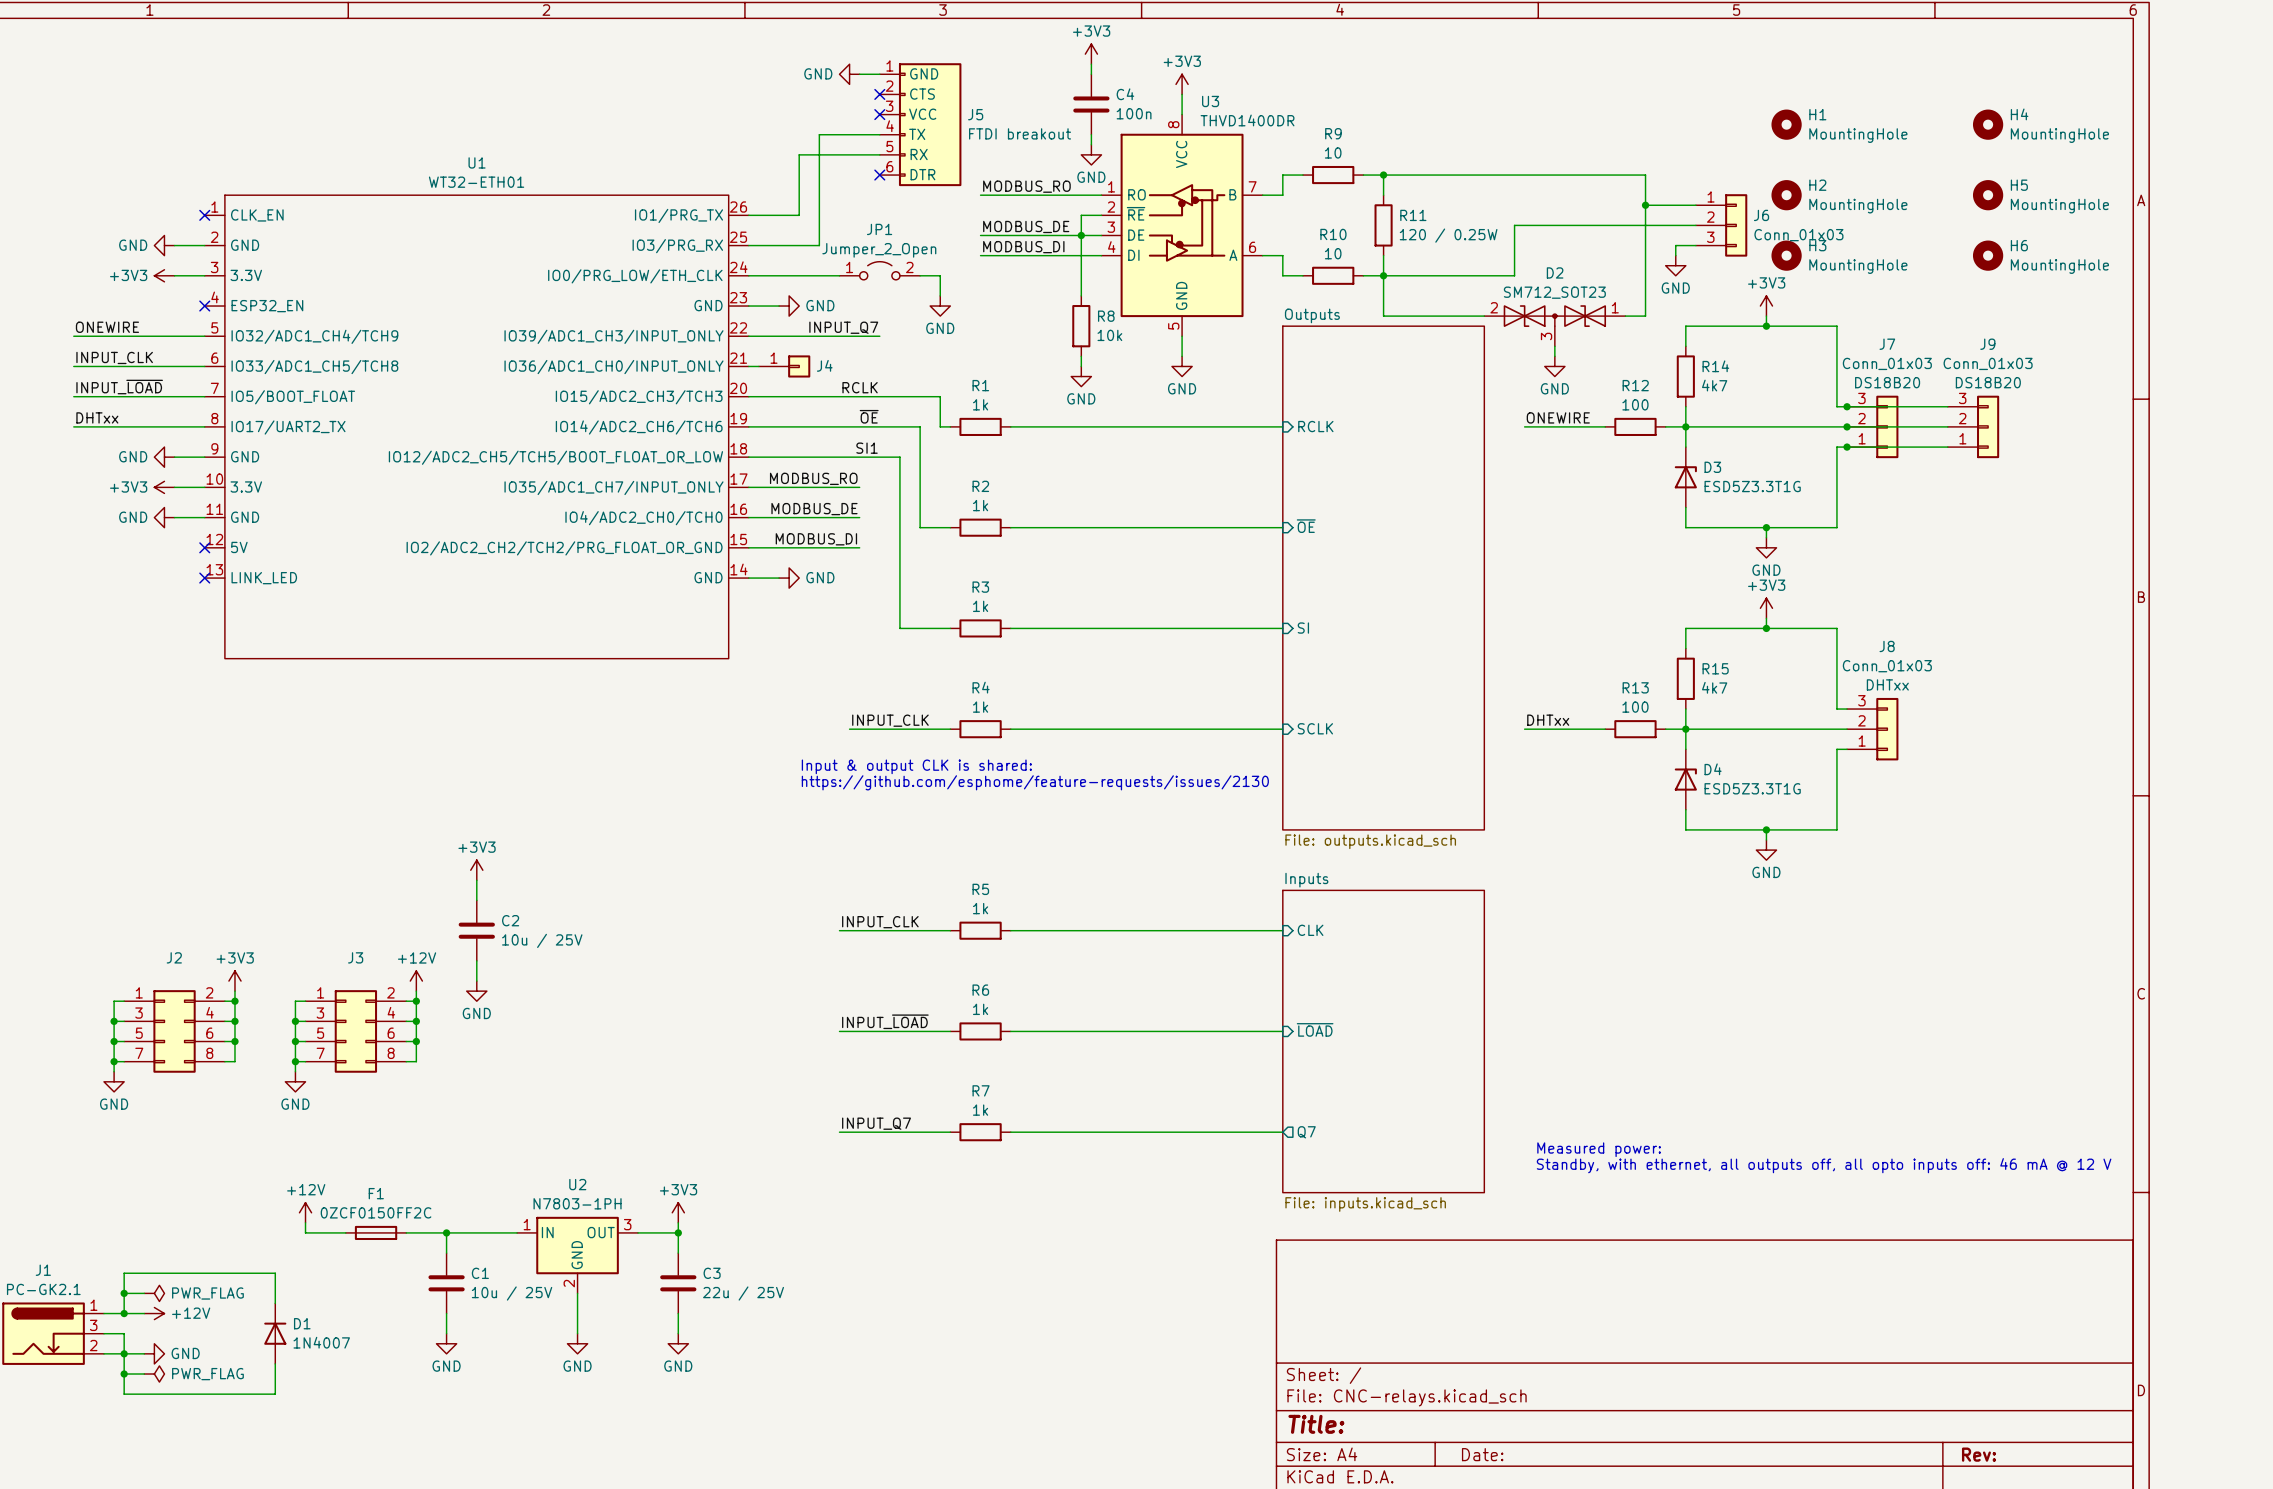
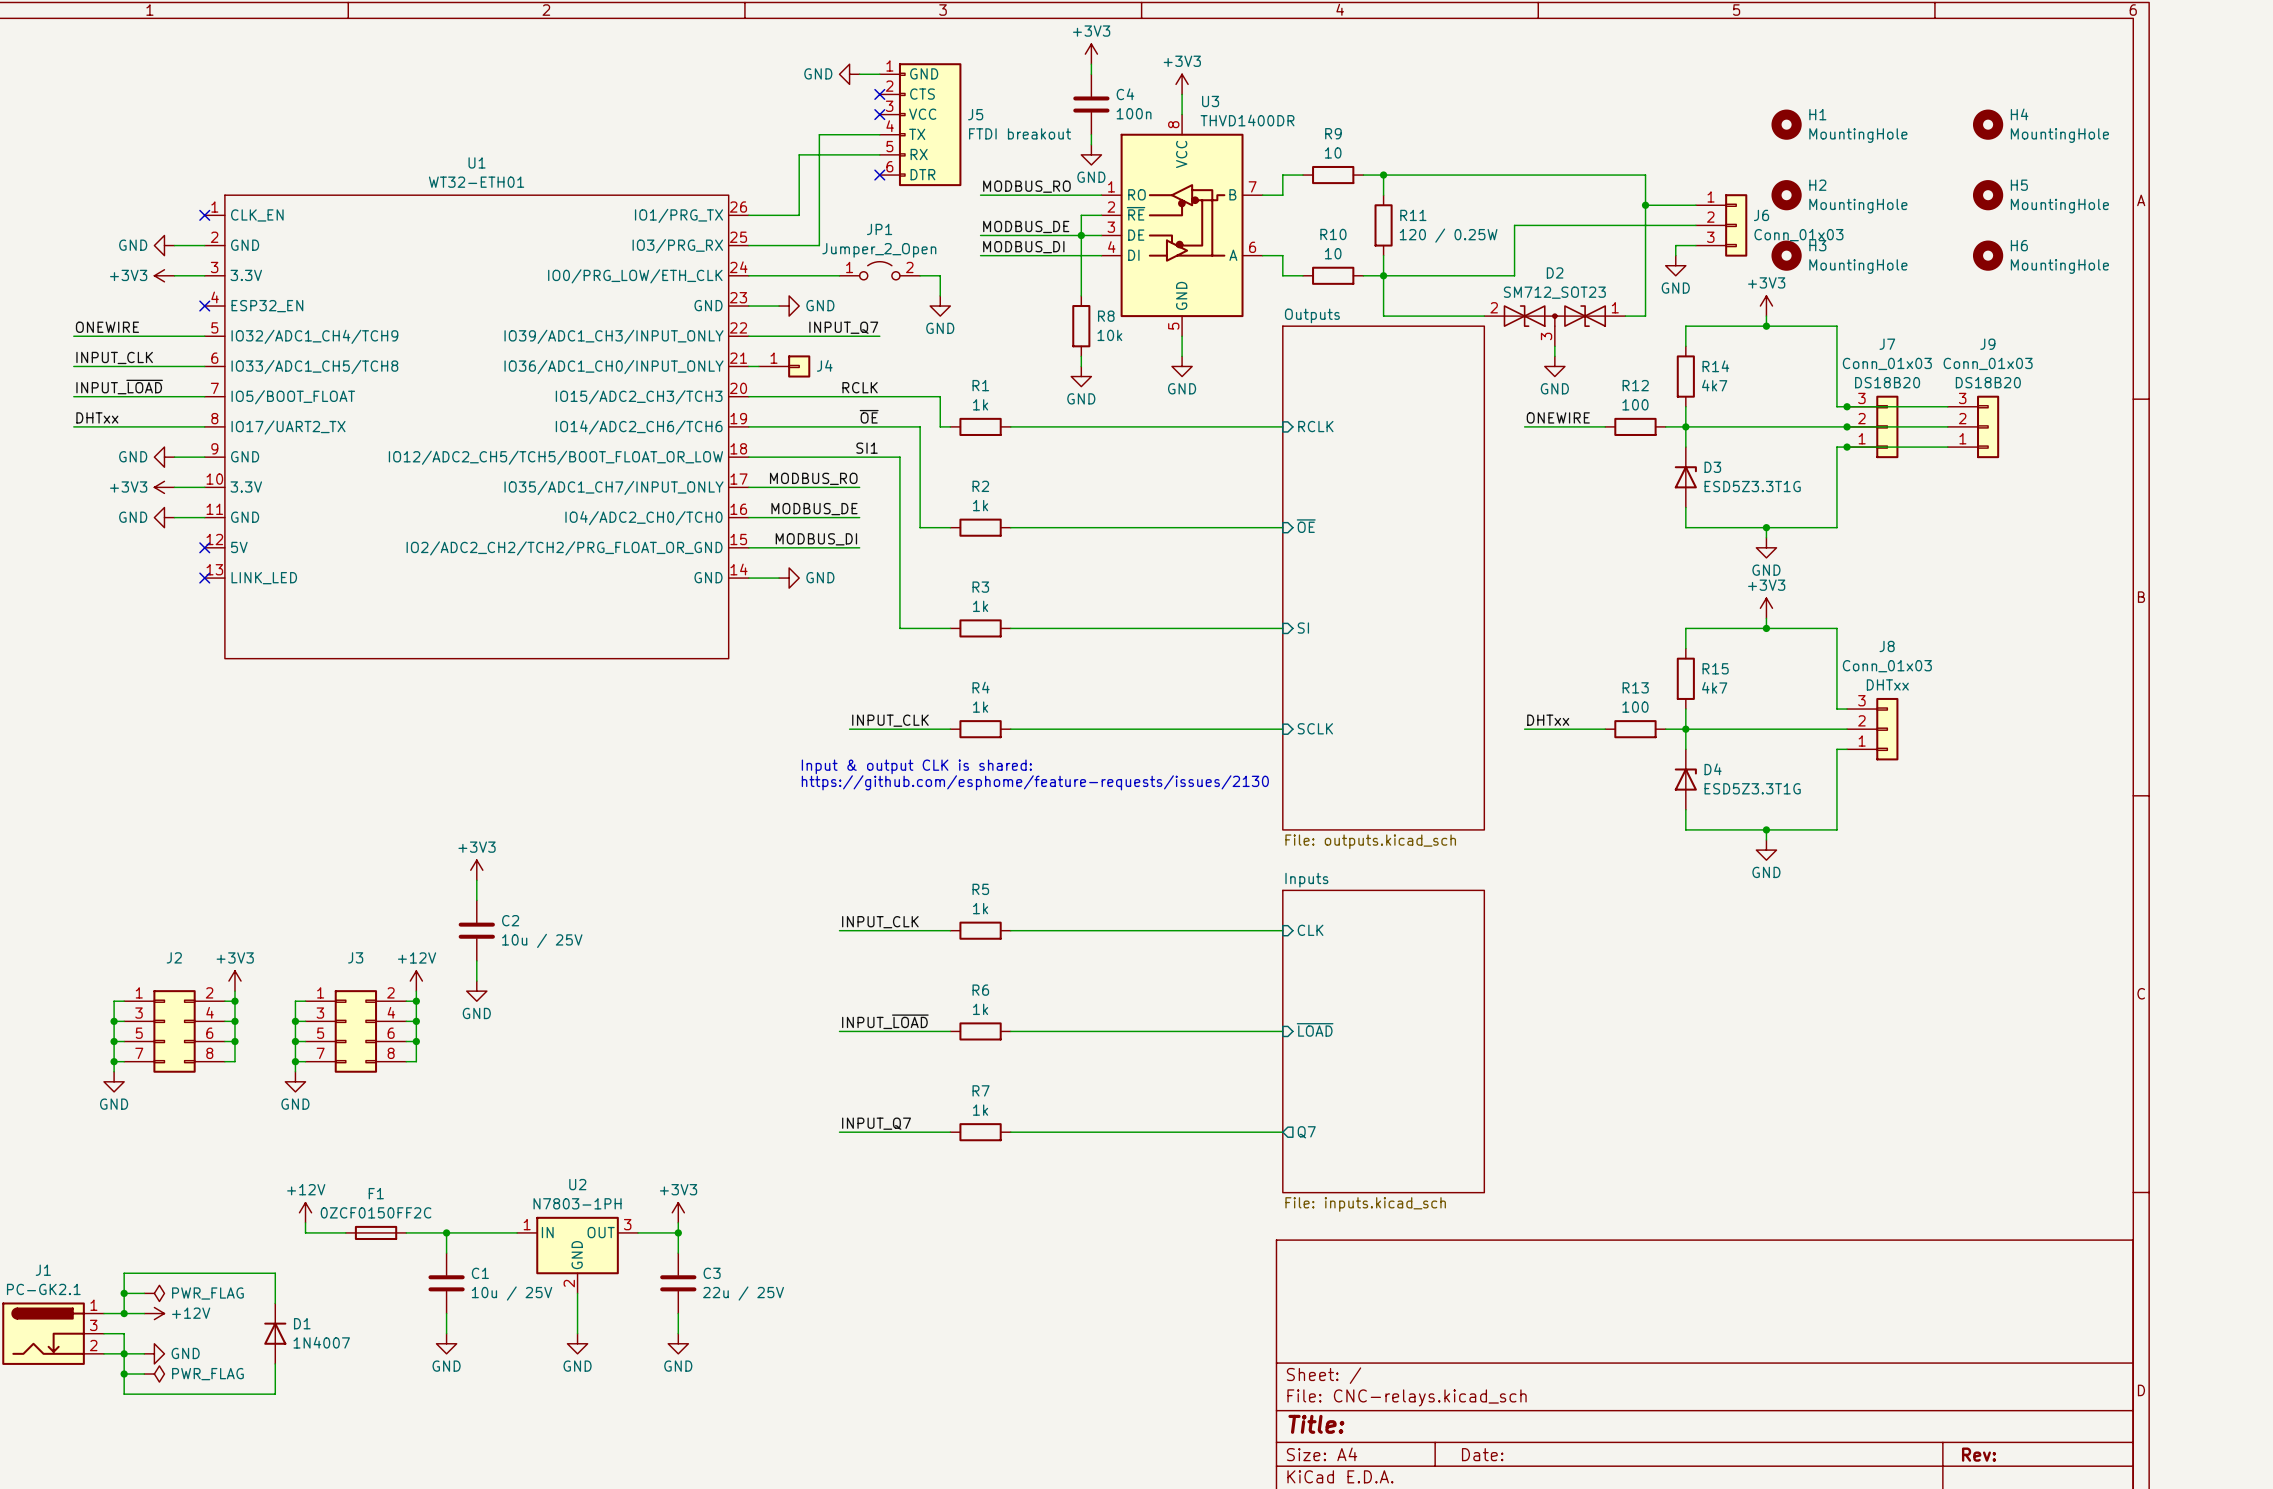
text: Measured power: (1599, 1149) -> none
text: Standby, with ethernet, all outputs off, all opto inputs off: 46 mA @ 12 V (1824, 1165) -> none

